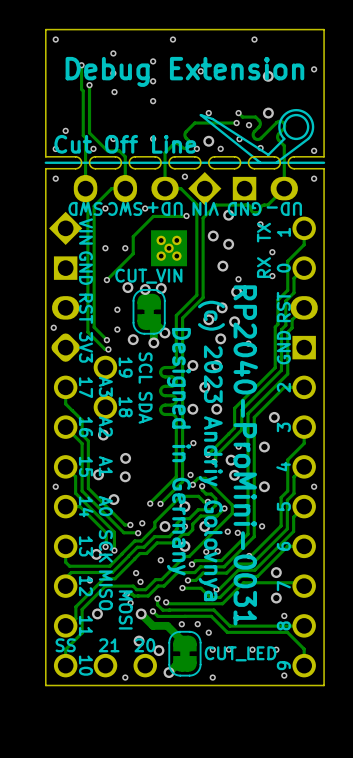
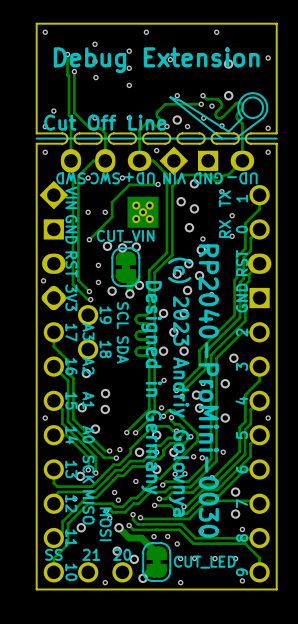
via: (93, 148) -> none
text: RP2040-ProMini-0031 (245, 455) -> RP2040-ProMini-0030 (209, 391)

